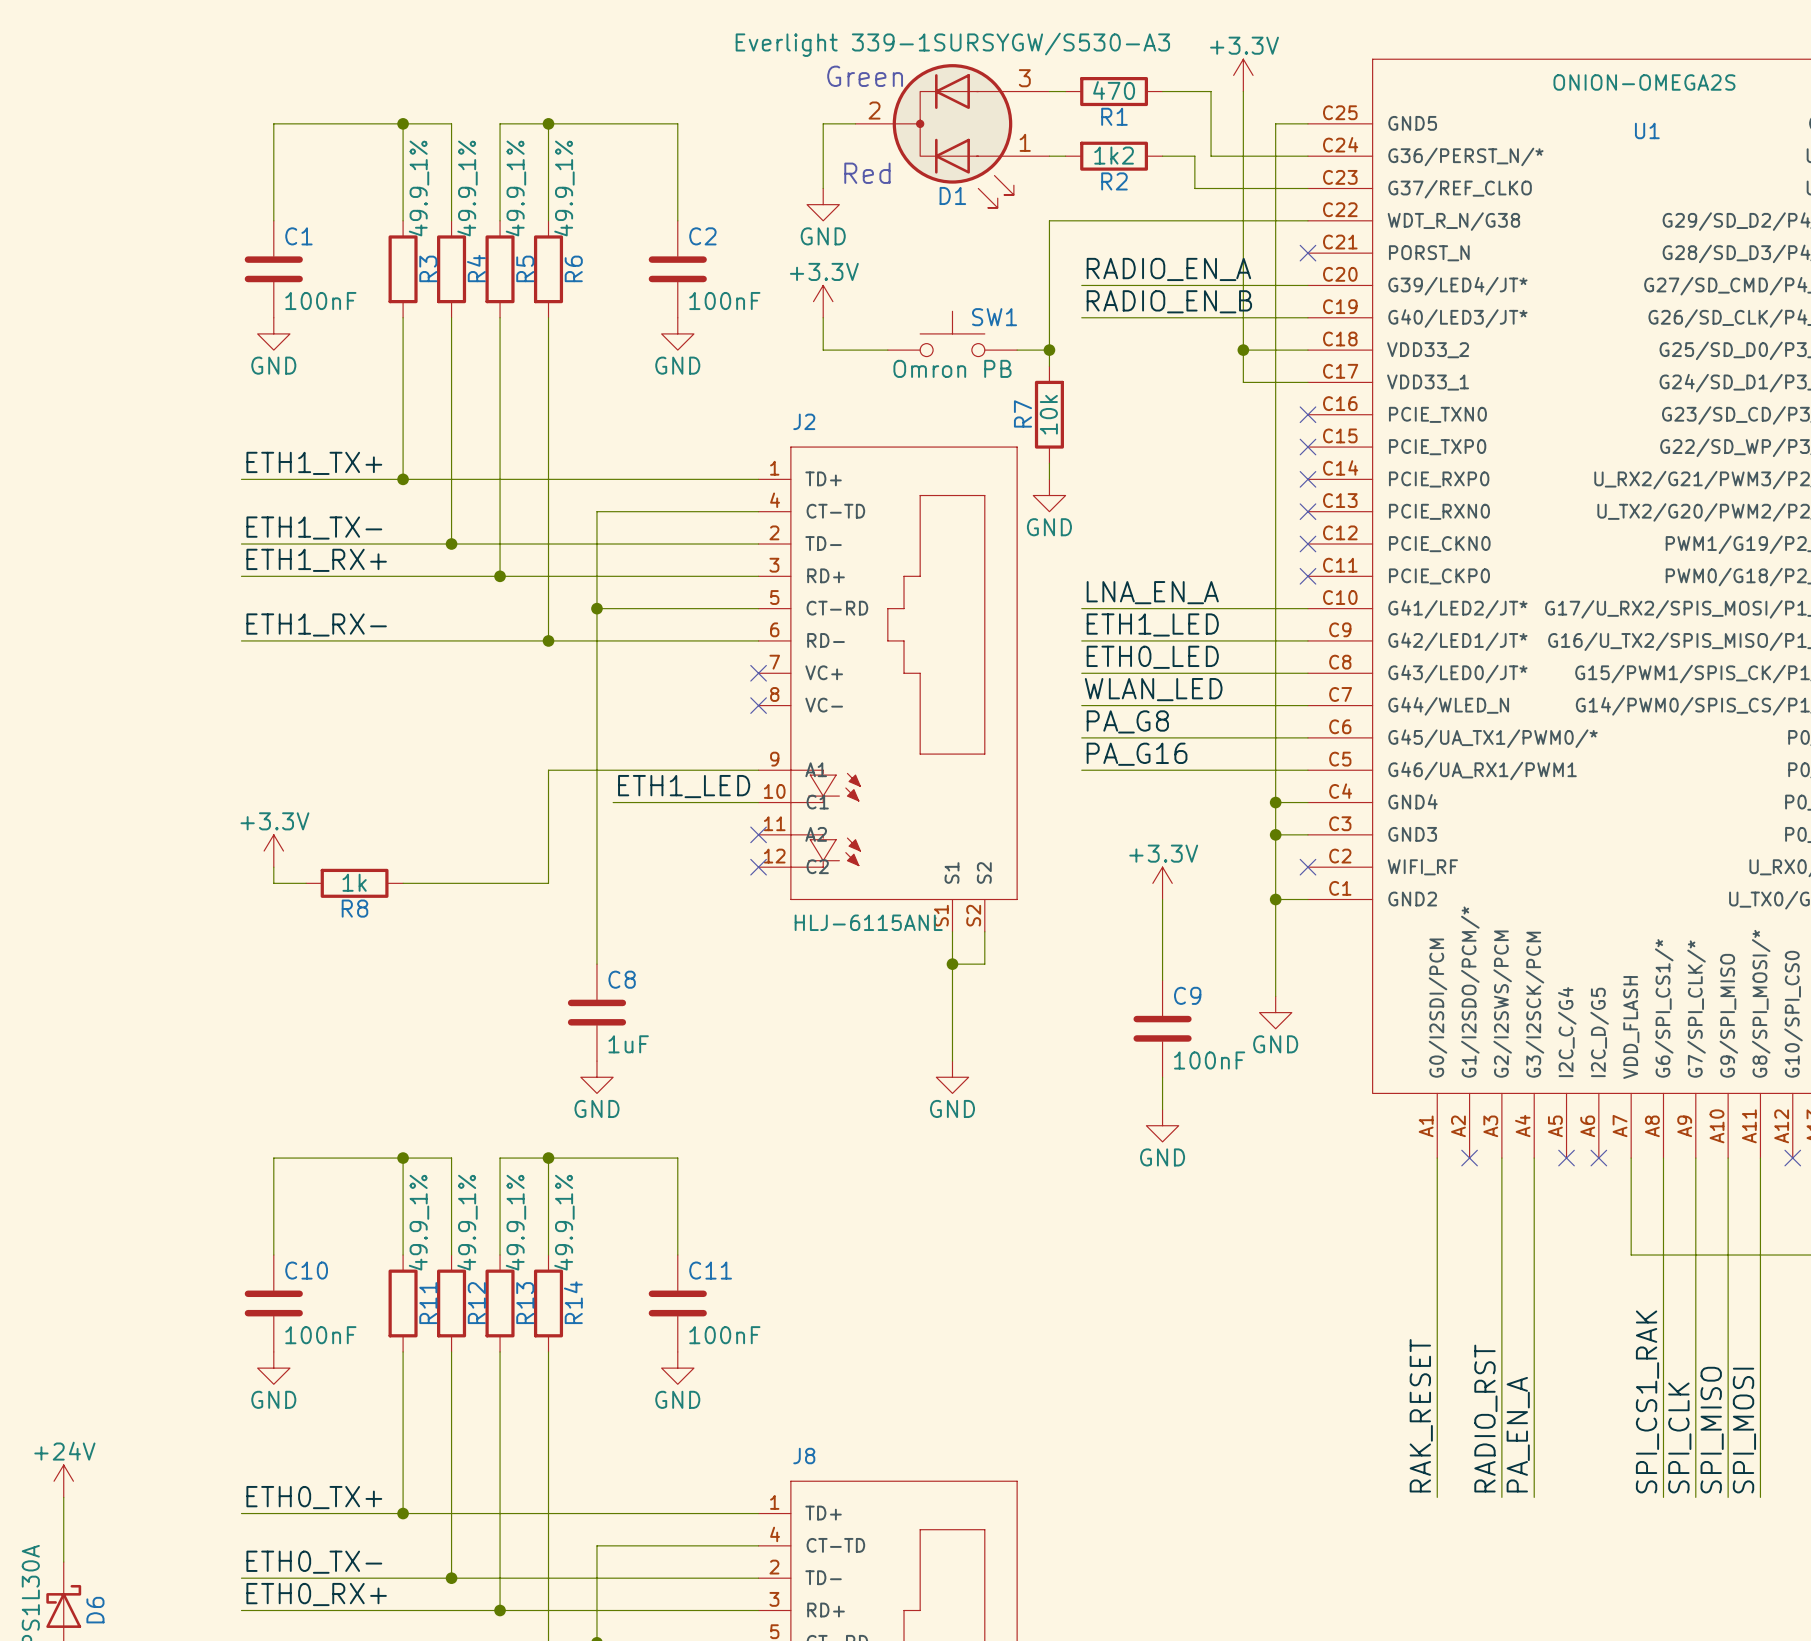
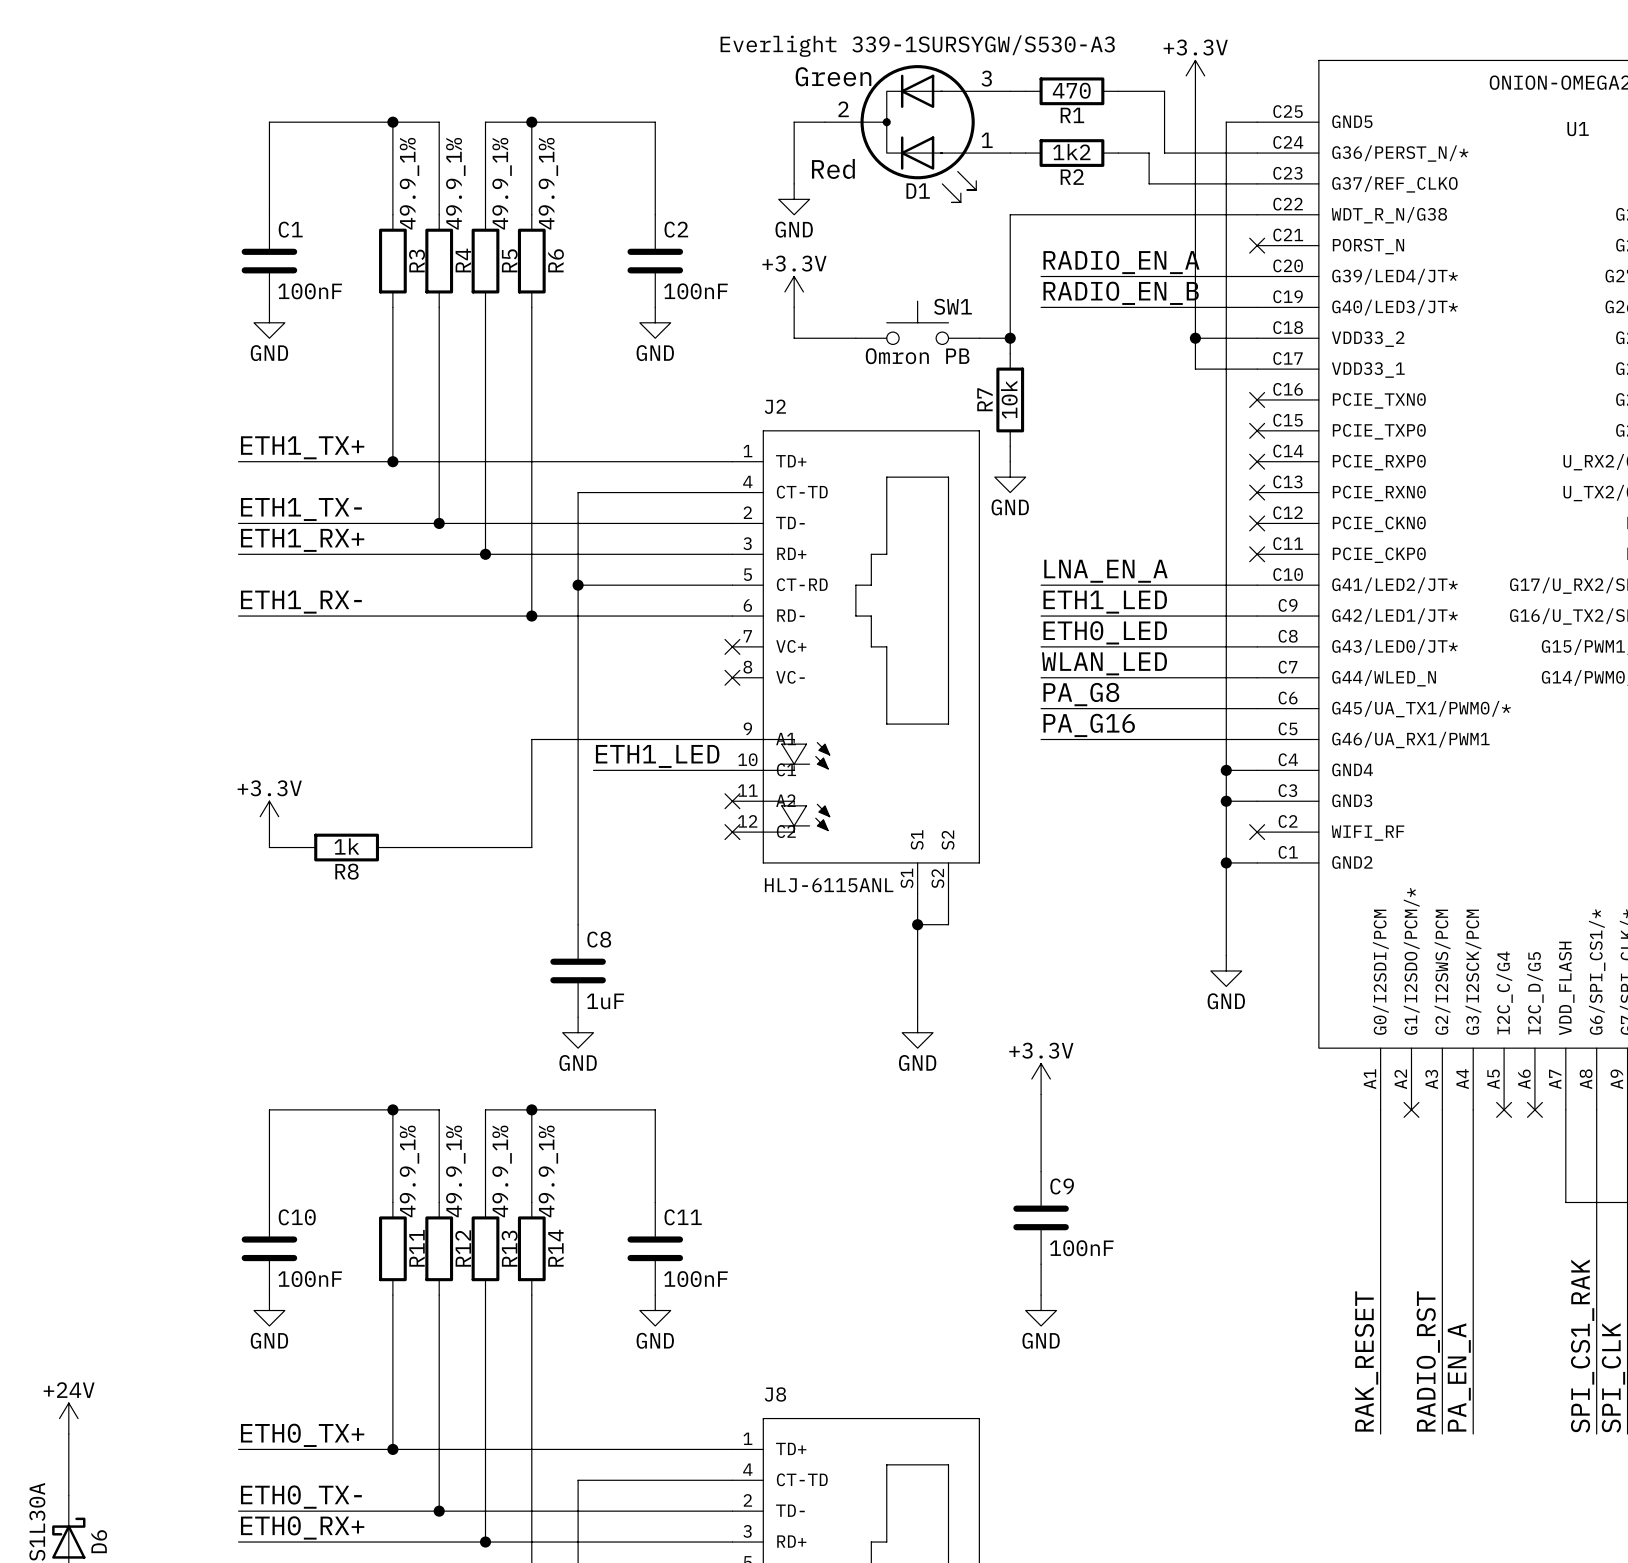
power symbol position: +3.3V (1162, 883) -> +3.3V (1041, 1079)
wire: (1162, 899) (1162, 980) -> (1041, 1094) (1041, 1171)
C9 position: (1162, 1028) -> (1041, 1217)
wire: (1162, 1077) (1162, 1109) -> (1041, 1264) (1041, 1295)
power symbol position: GND (1162, 1125) -> GND (1041, 1310)

